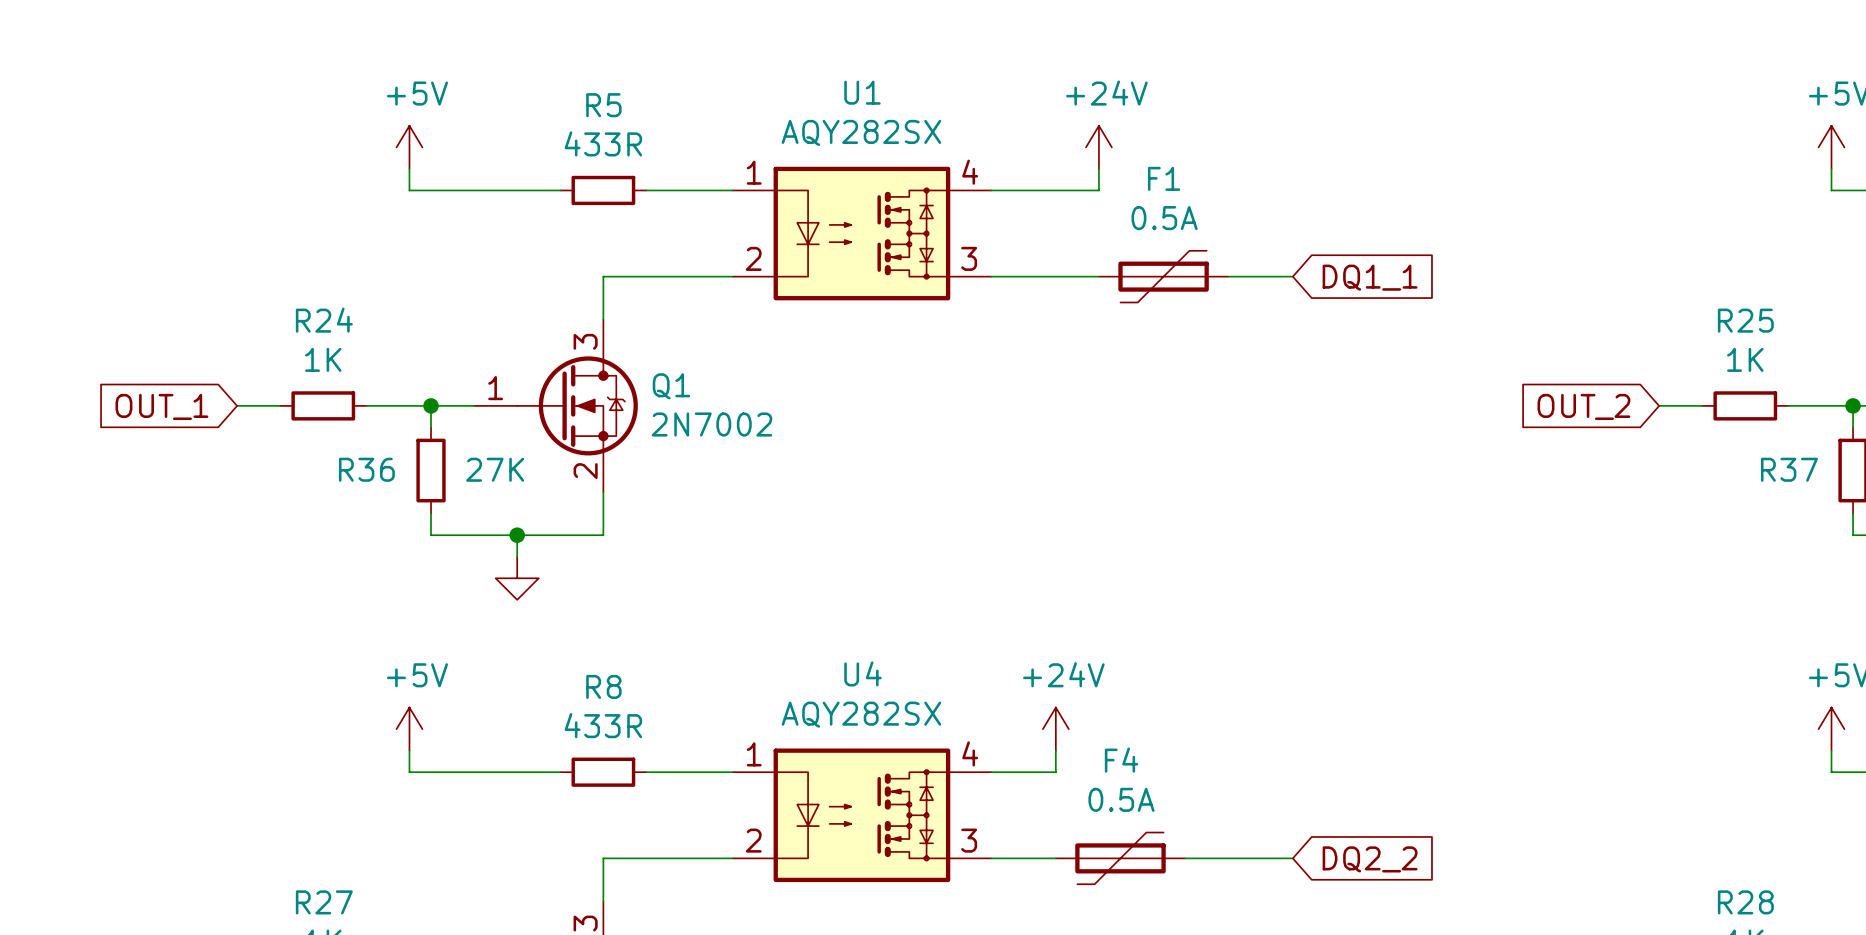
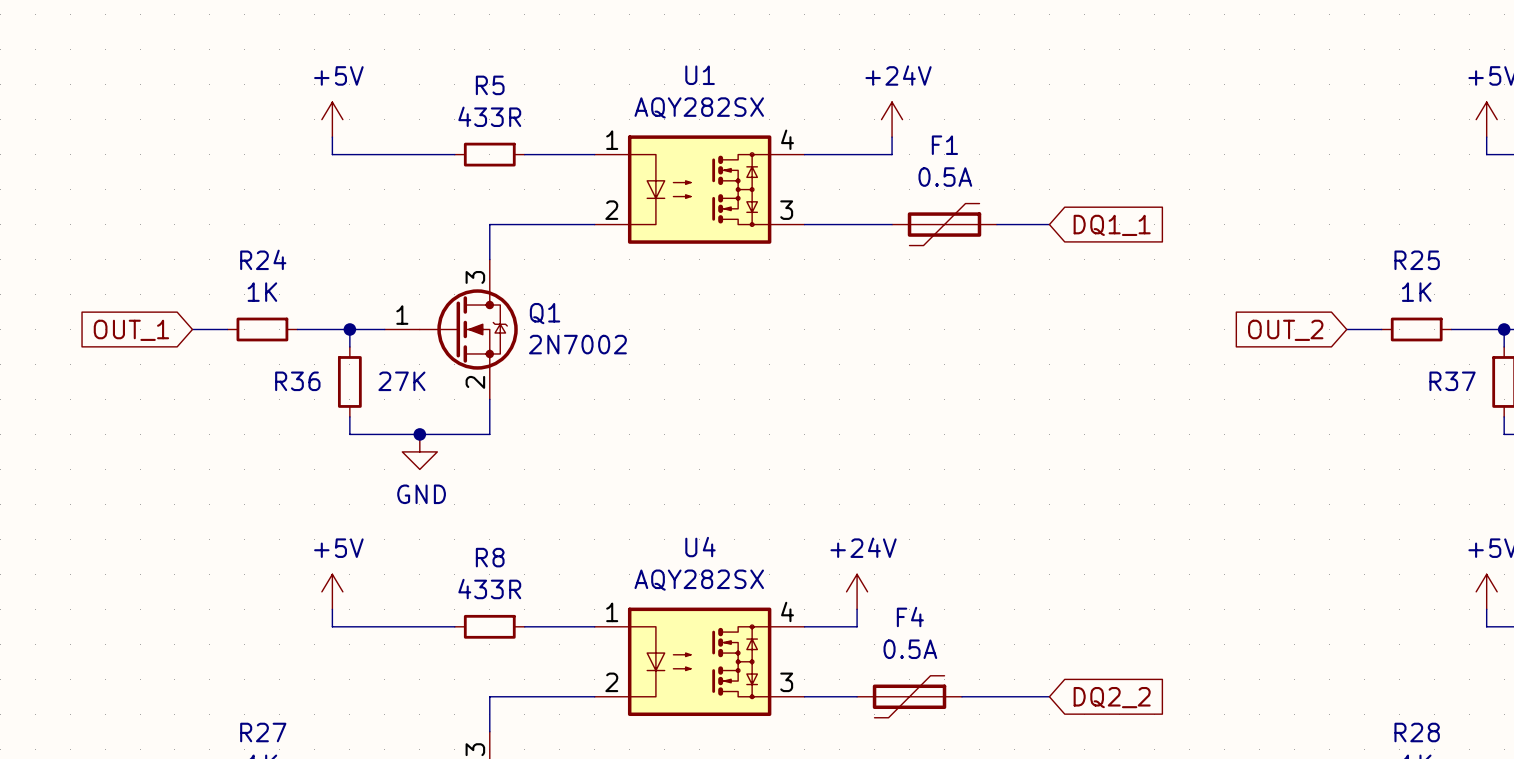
power symbol: none -> GND (419, 451)
power symbol: (517, 578) -> none

